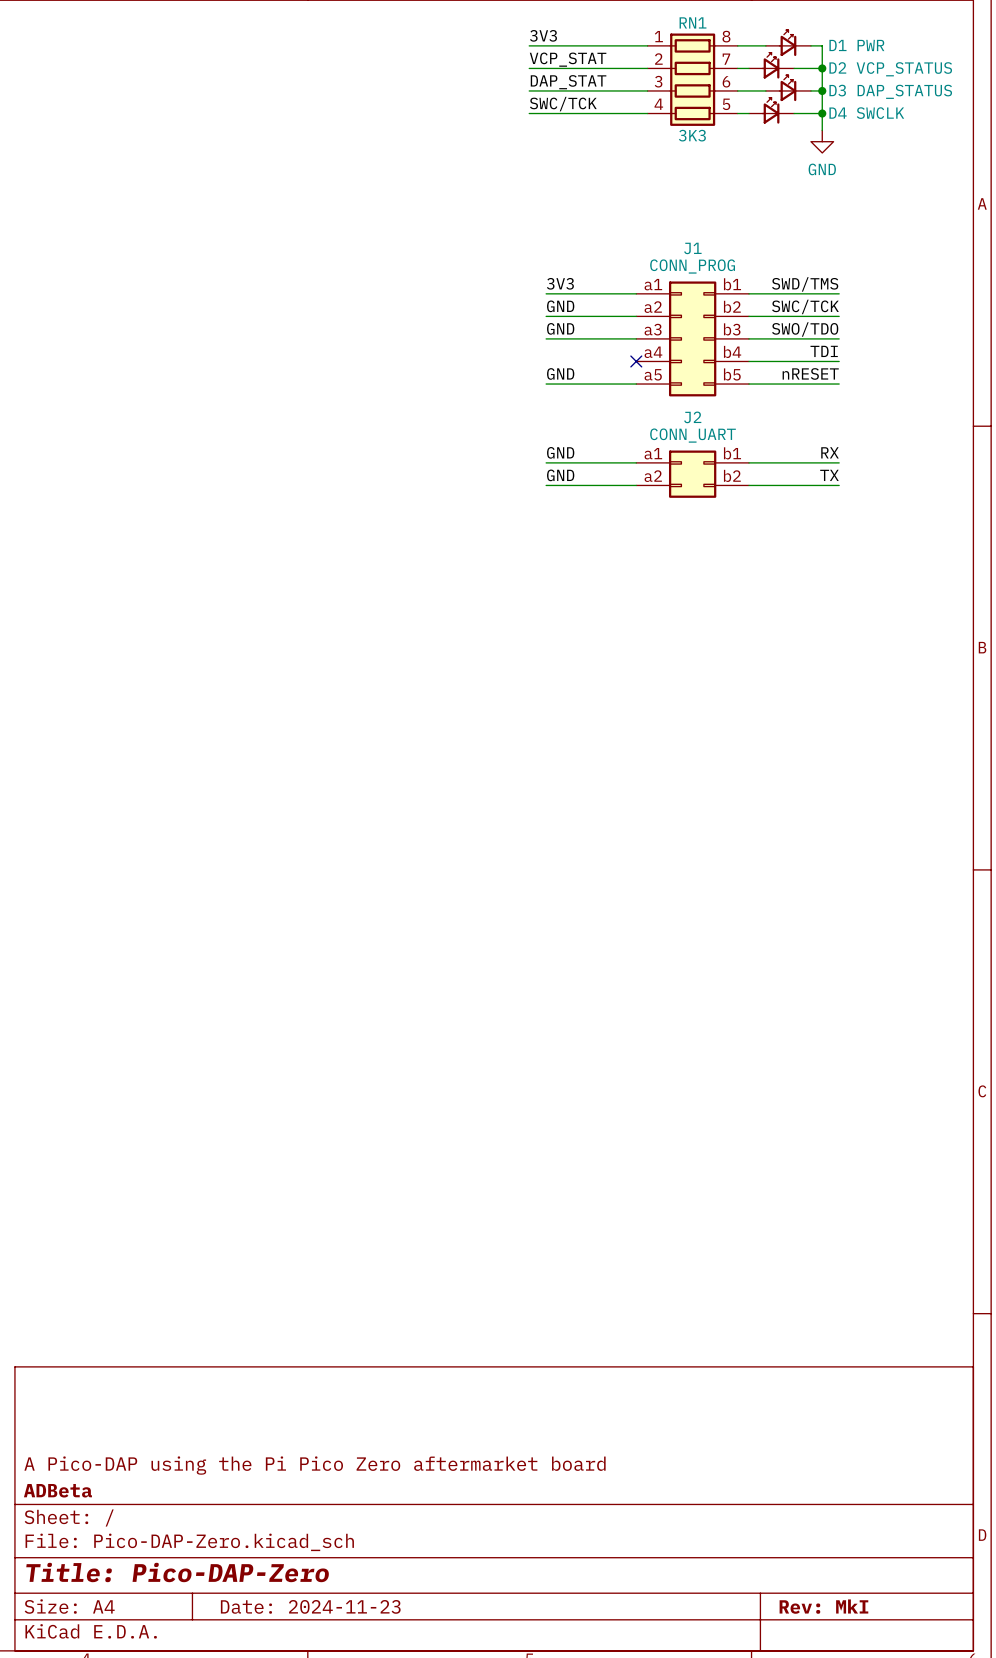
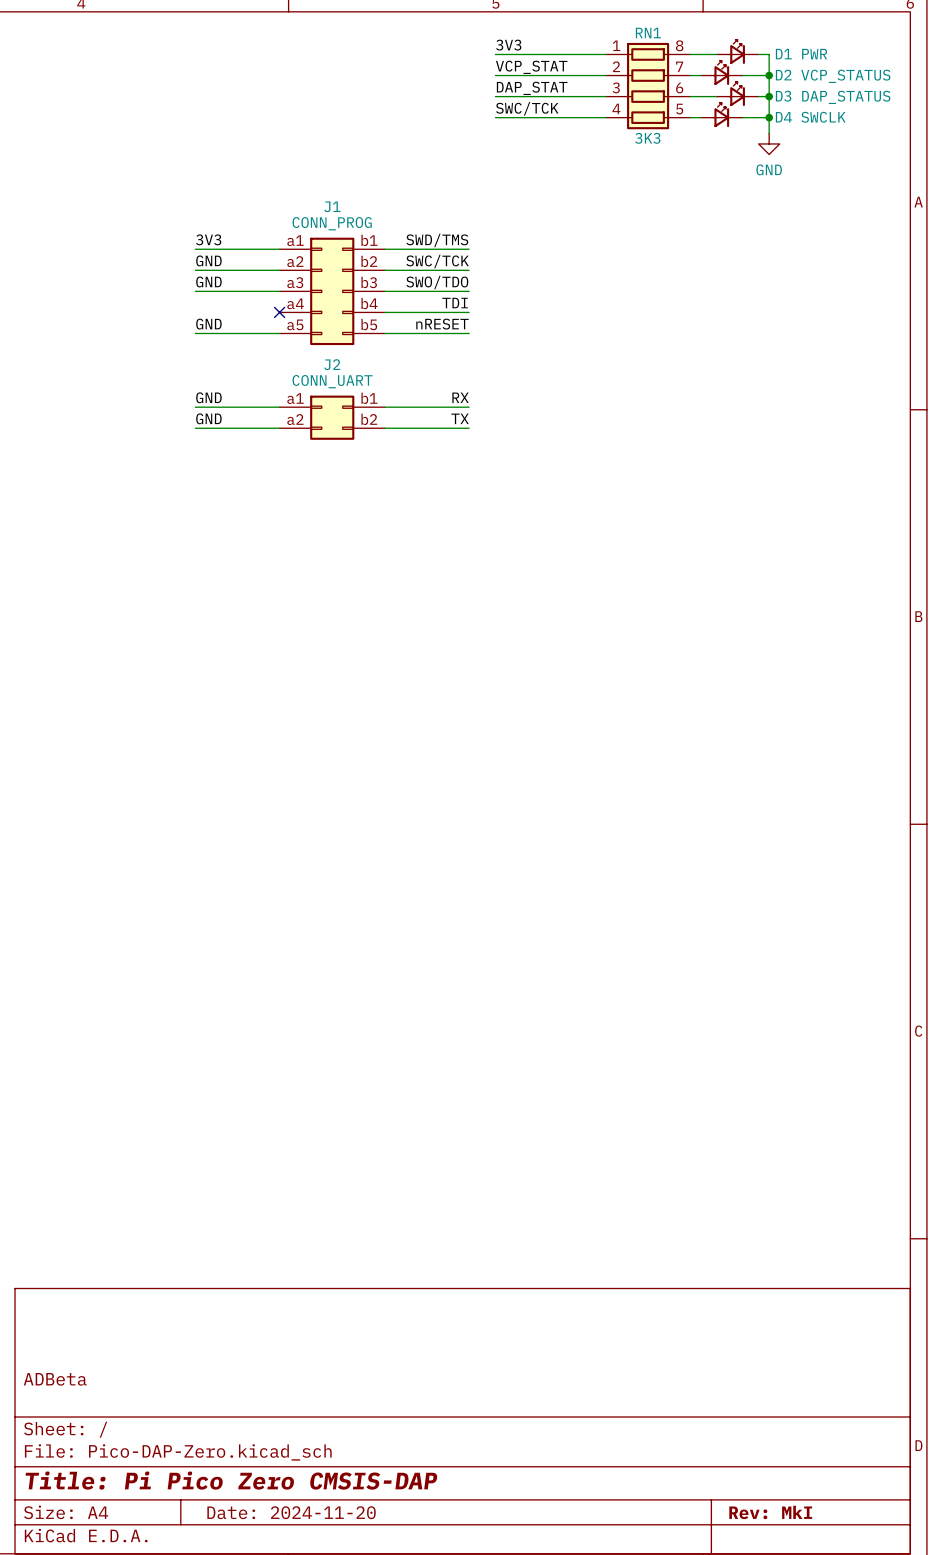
label: none -> 3V3 (208, 239)
label: none -> SWD/TMS (437, 240)
wire: none -> (195, 249) (279, 249)
label: none -> GND (208, 260)
label: none -> SWC/TCK (437, 261)
wire: none -> (195, 270) (279, 270)
label: 3V3 (560, 283) -> none
label: SWD/TMS (805, 284) -> none
label: none -> GND (208, 281)
label: none -> SWO/TDO (437, 282)
wire: (546, 293) (636, 293) -> (384, 249) (469, 249)
wire: (749, 293) (839, 293) -> none
wire: none -> (195, 291) (279, 291)
label: GND (560, 306) -> none
label: SWC/TCK (805, 306) -> none
label: none -> TDI (455, 303)
wire: (546, 316) (636, 316) -> (384, 270) (469, 270)
wire: (749, 316) (839, 316) -> none
no-connect mark: none -> (279, 312)
wire: none -> (384, 312) (469, 312)
label: GND (560, 328) -> none
label: SWO/TDO (805, 329) -> none
label: none -> GND (208, 324)
label: none -> nRESET (442, 324)
wire: (546, 338) (636, 338) -> (384, 291) (469, 291)
J1 position: (692, 338) -> (332, 291)
wire: (749, 338) (839, 338) -> none
wire: none -> (195, 333) (279, 333)
label: TDI (824, 351) -> none
no-connect mark: (636, 361) -> none
wire: (749, 361) (839, 361) -> none
label: GND (560, 373) -> none
label: nRESET (810, 373) -> none
wire: (546, 384) (636, 384) -> (384, 333) (469, 333)
wire: (749, 384) (839, 384) -> none
label: none -> GND (208, 397)
label: none -> RX (460, 397)
wire: none -> (195, 407) (279, 407)
label: none -> GND (208, 418)
label: none -> TX (460, 418)
wire: none -> (195, 428) (279, 428)
label: GND (560, 452) -> none
label: RX (830, 452) -> none
wire: (546, 462) (636, 462) -> (384, 407) (469, 407)
wire: (749, 462) (839, 462) -> none
J2 position: (692, 474) -> (332, 417)
label: GND (560, 475) -> none
label: TX (829, 475) -> none
wire: (546, 485) (636, 485) -> (384, 428) (469, 428)
wire: (749, 485) (839, 485) -> none
title block: A Pico-DAP using the Pi Pico Zero aftermarket board (315, 1465) -> ADBeta (55, 1379)
title block: ADBeta (57, 1490) -> none
title block: Title: Pico-DAP-Zero (177, 1572) -> Title: Pi Pico Zero CMSIS-DAP (231, 1480)
title block: Date: 2024-11-23 (310, 1606) -> Date: 2024-11-20 (291, 1512)

